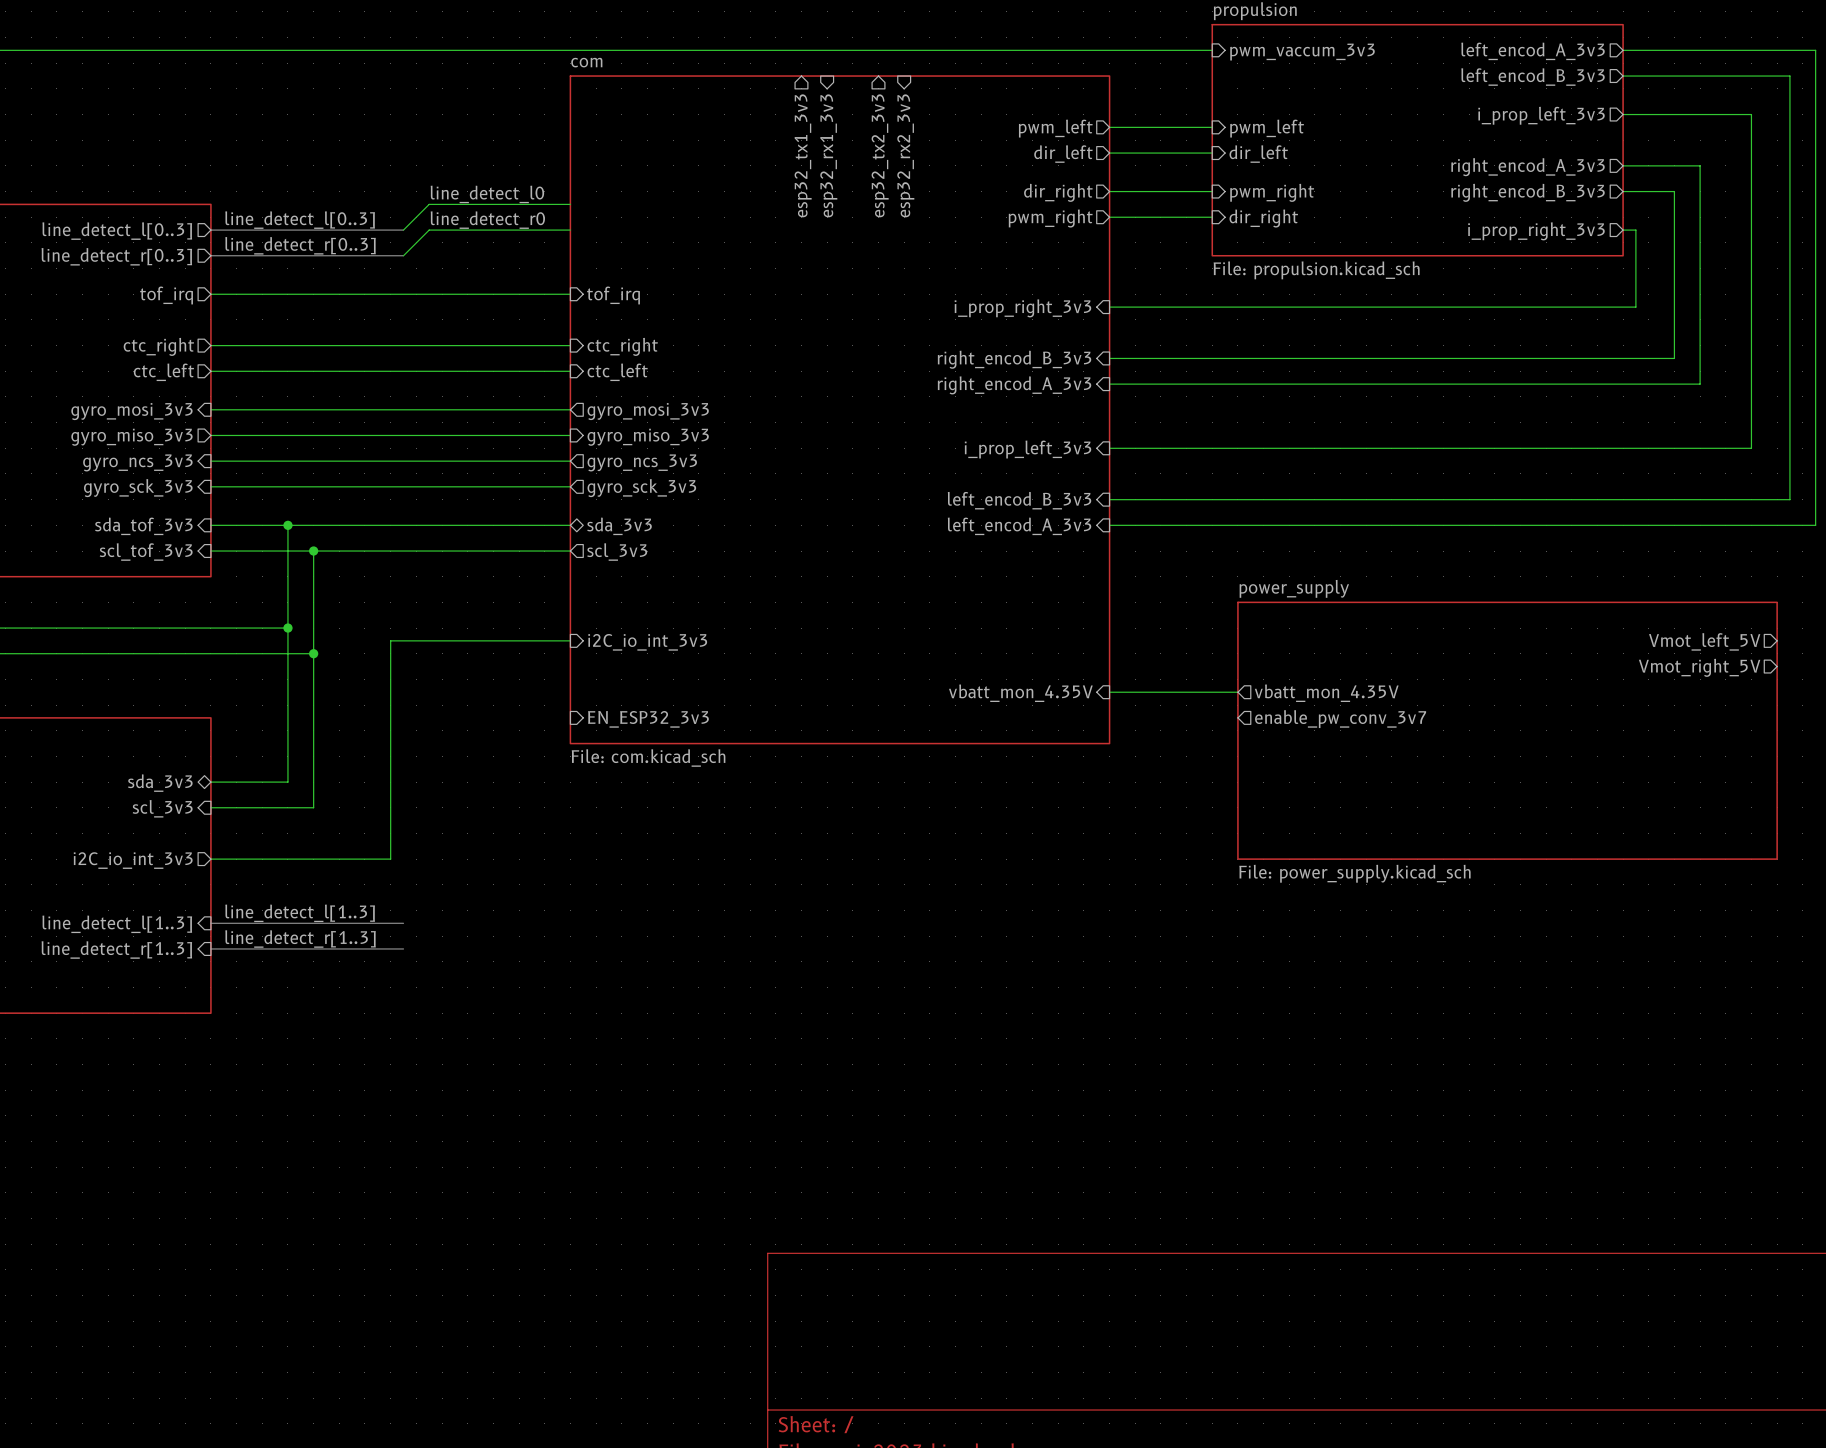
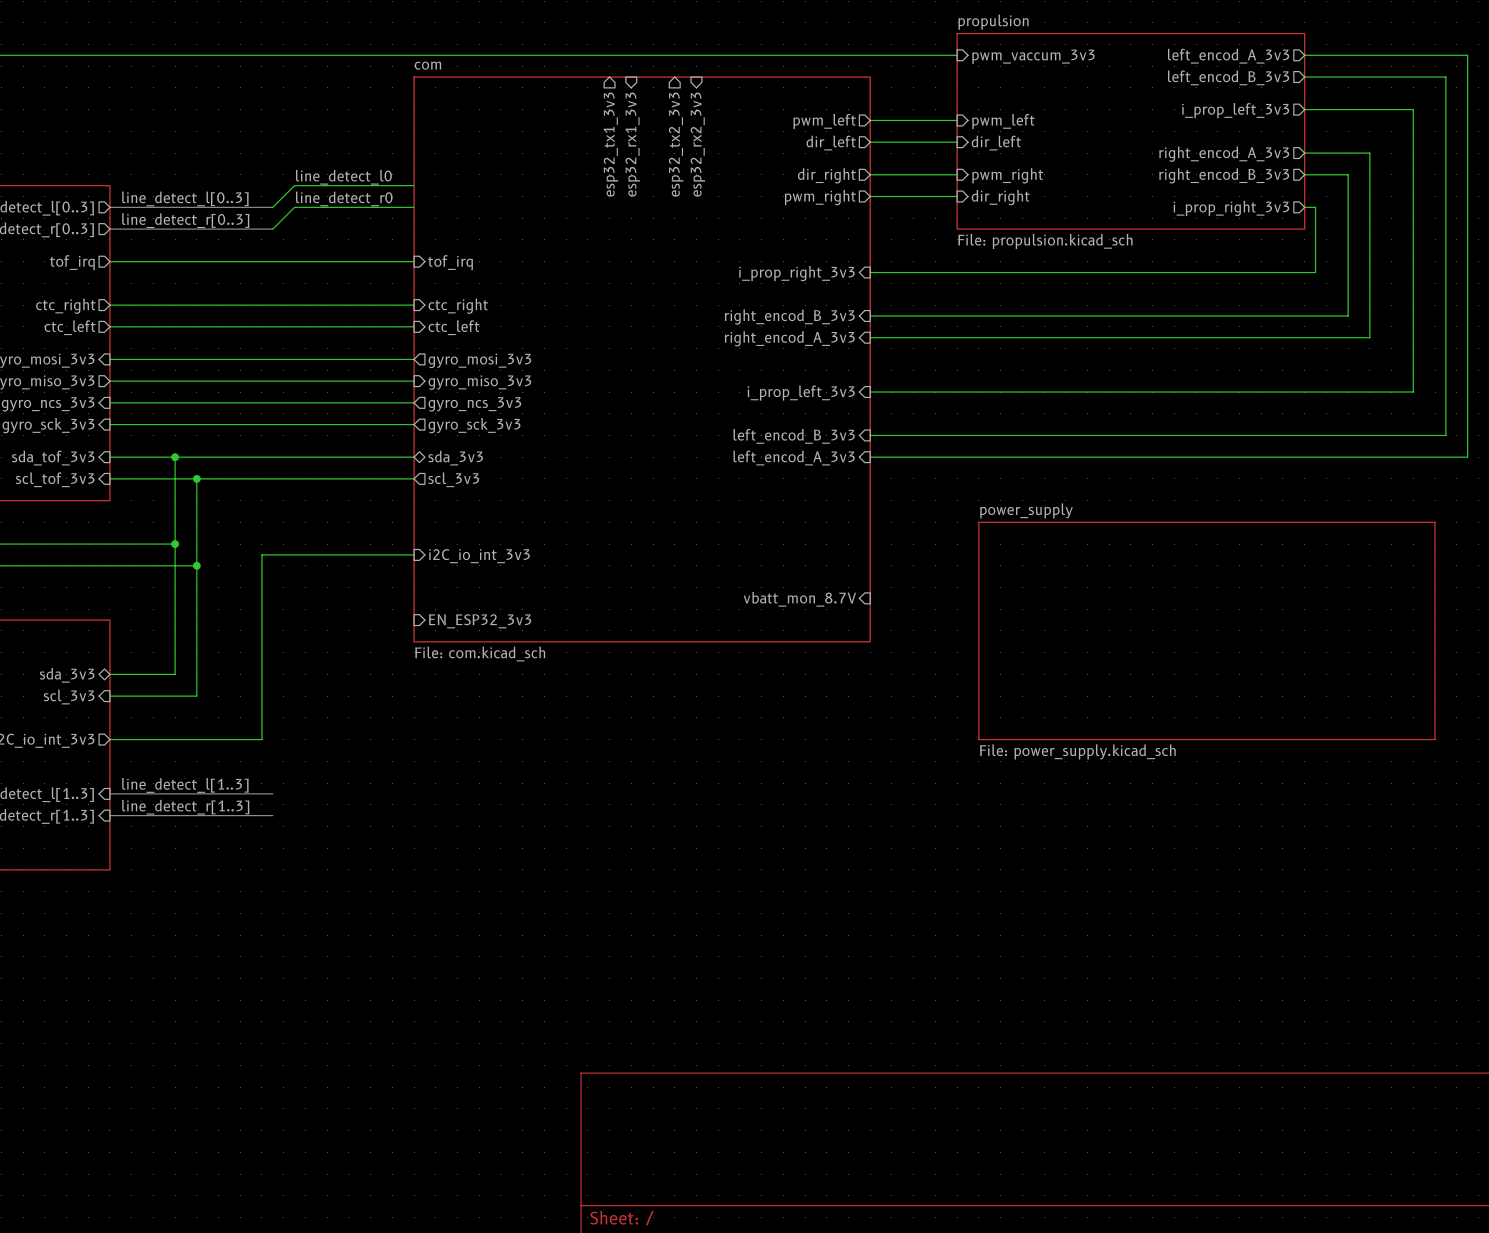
sheet pin: Vmot_left_5V (1704, 641) -> none
sheet pin: Vmot_right_5V (1699, 667) -> none
wire: (1109, 692) (1237, 692) -> none
sheet pin: vbatt_mon_4.35V (1020, 693) -> vbatt_mon_8.7V (799, 599)
sheet pin: vbatt_mon_4.35V (1326, 693) -> none
sheet pin: enable_pw_conv_3v7 (1340, 719) -> none

